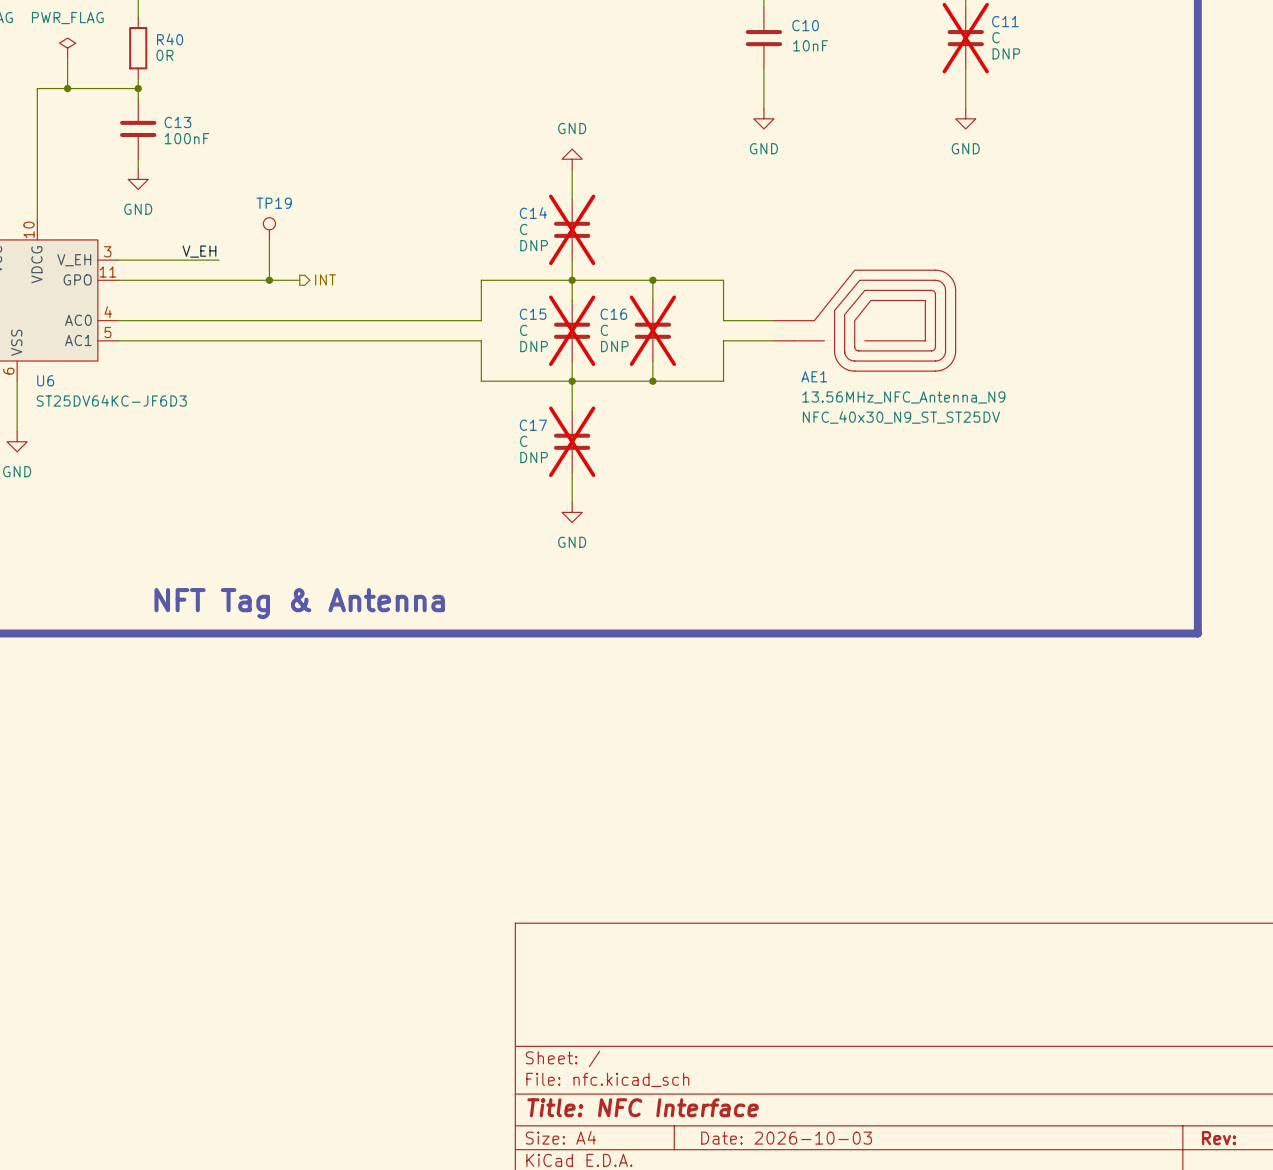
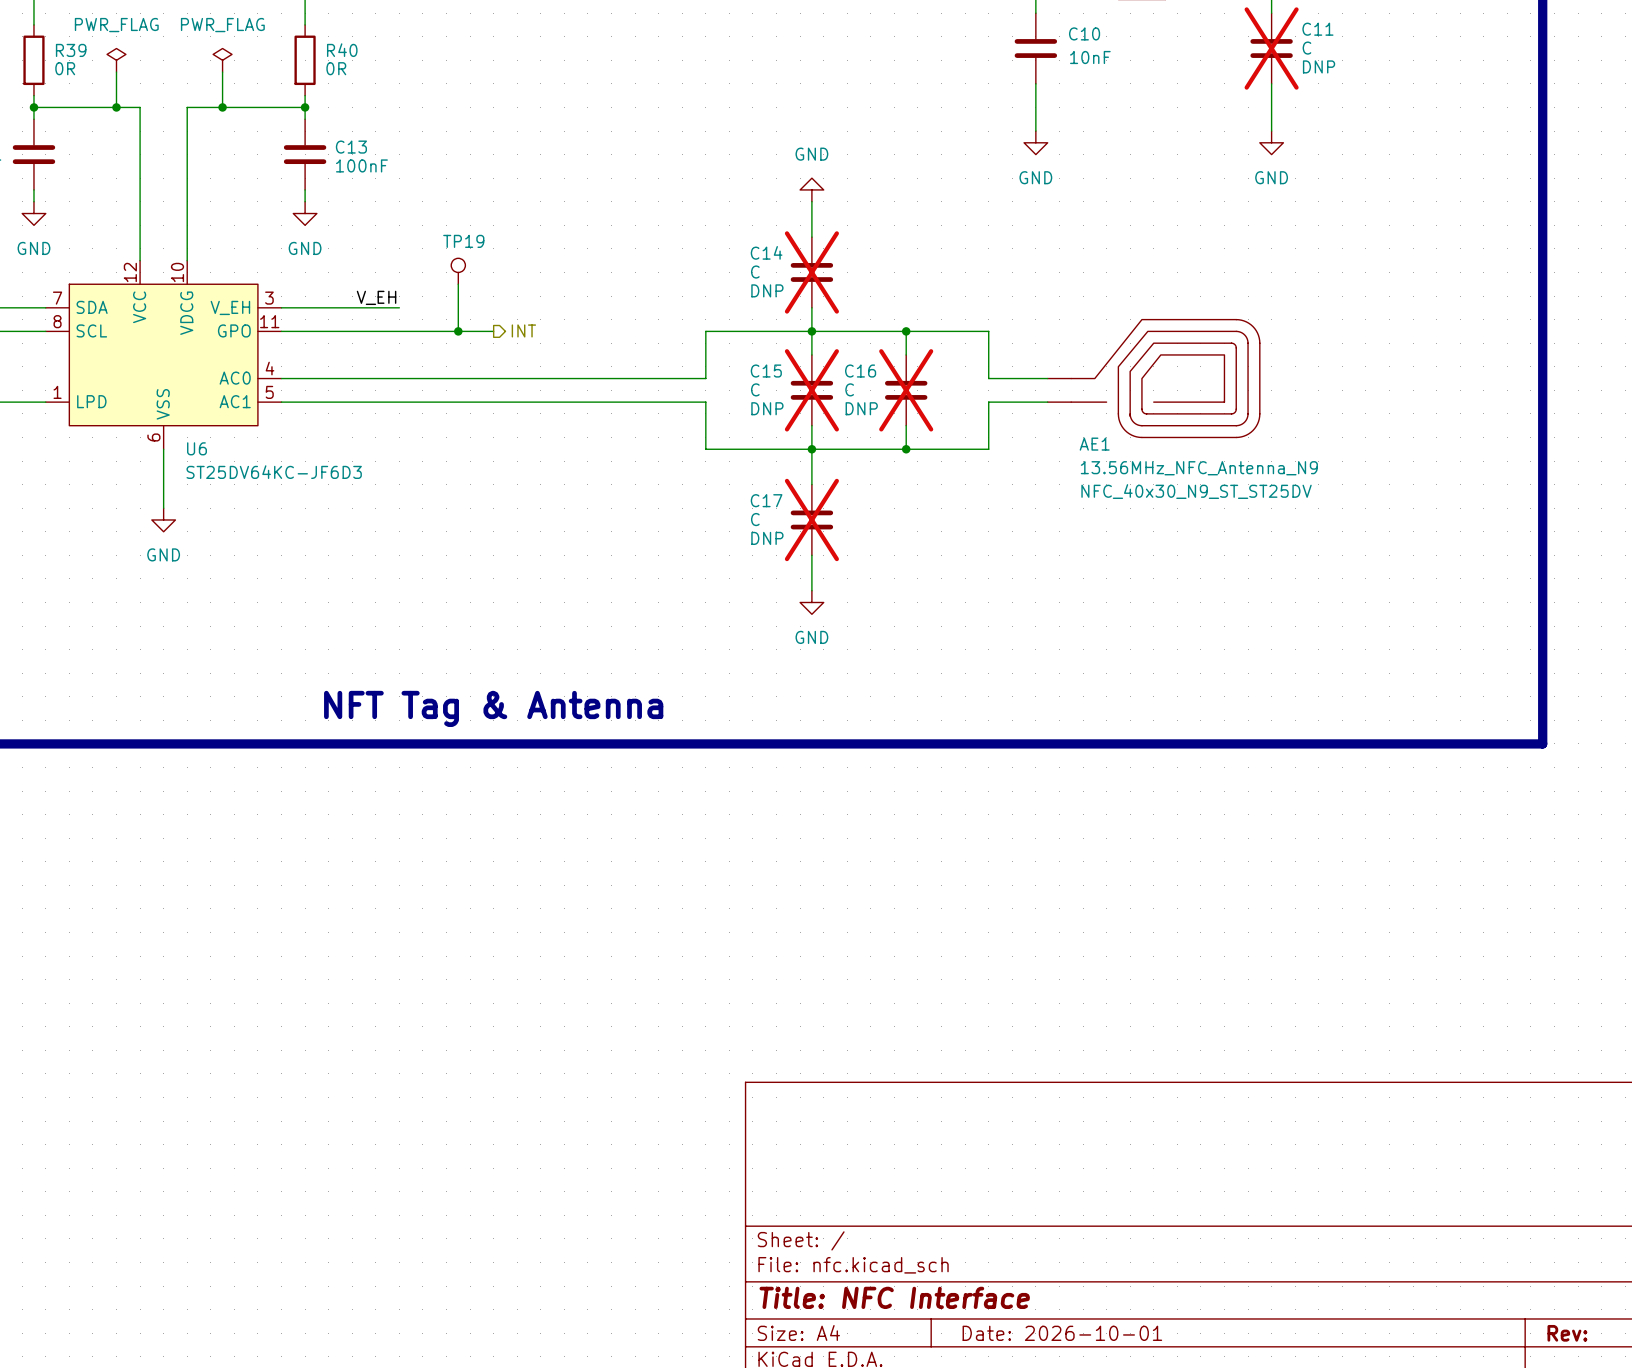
title block: Date: 2026-10-03 (786, 1138) -> Date: 2026-10-01 (1062, 1333)

